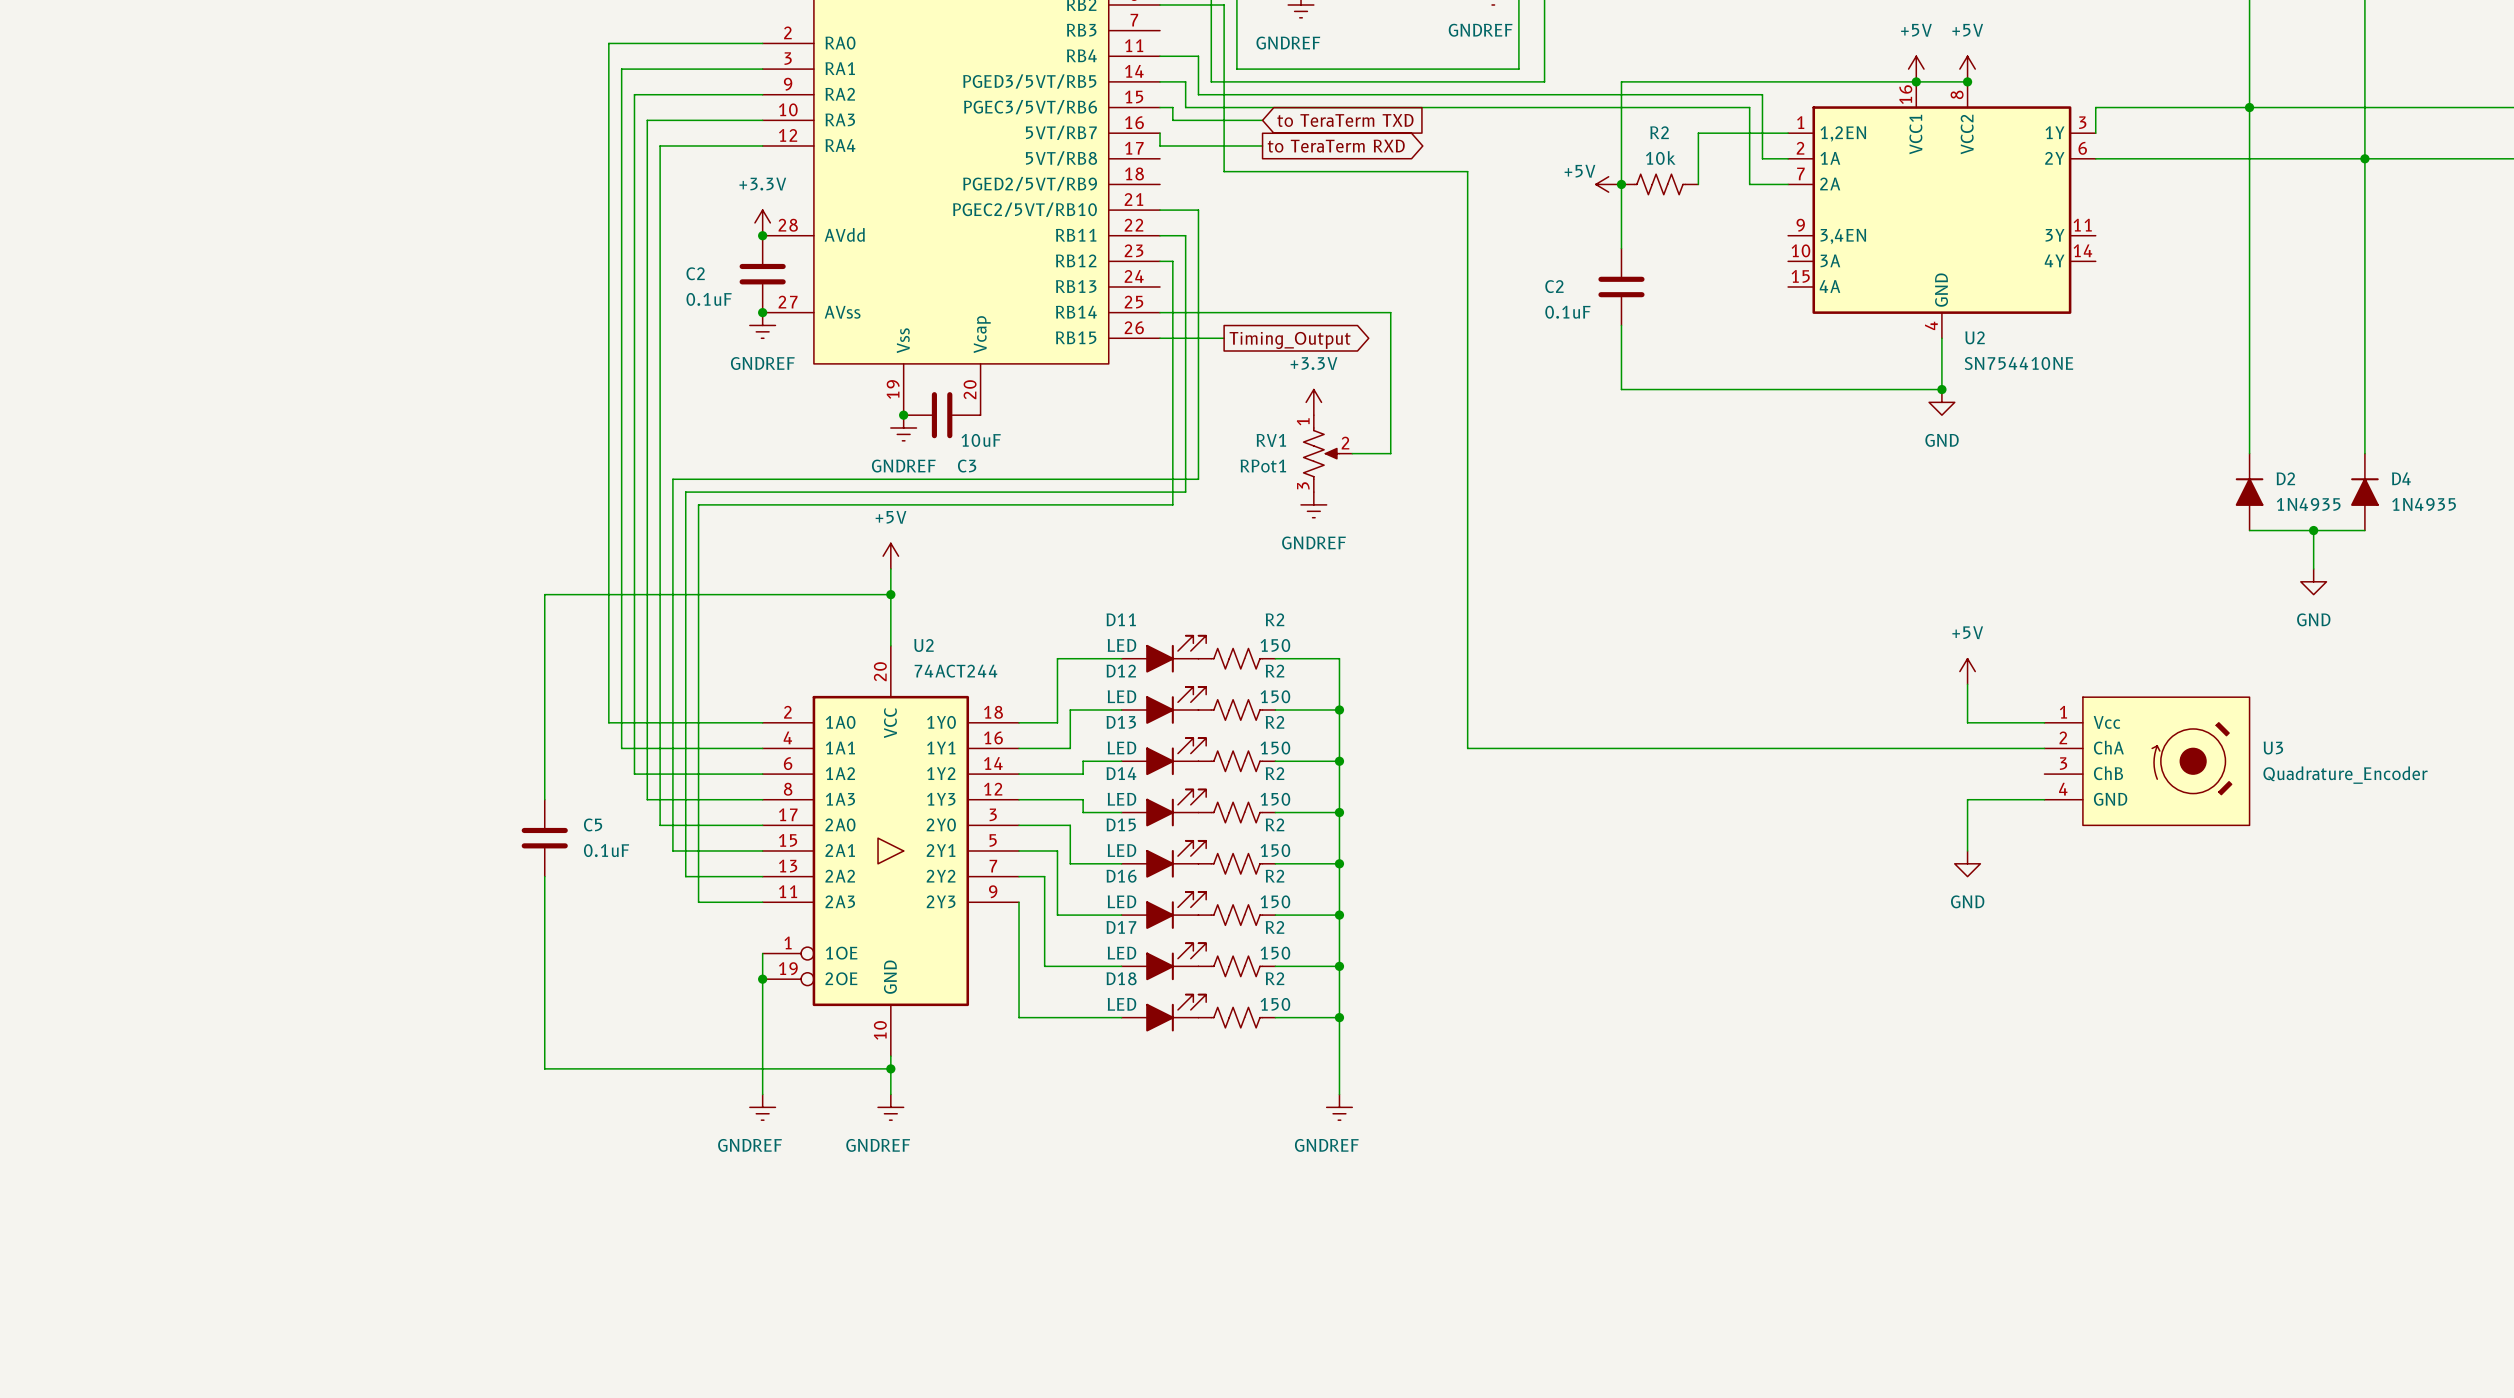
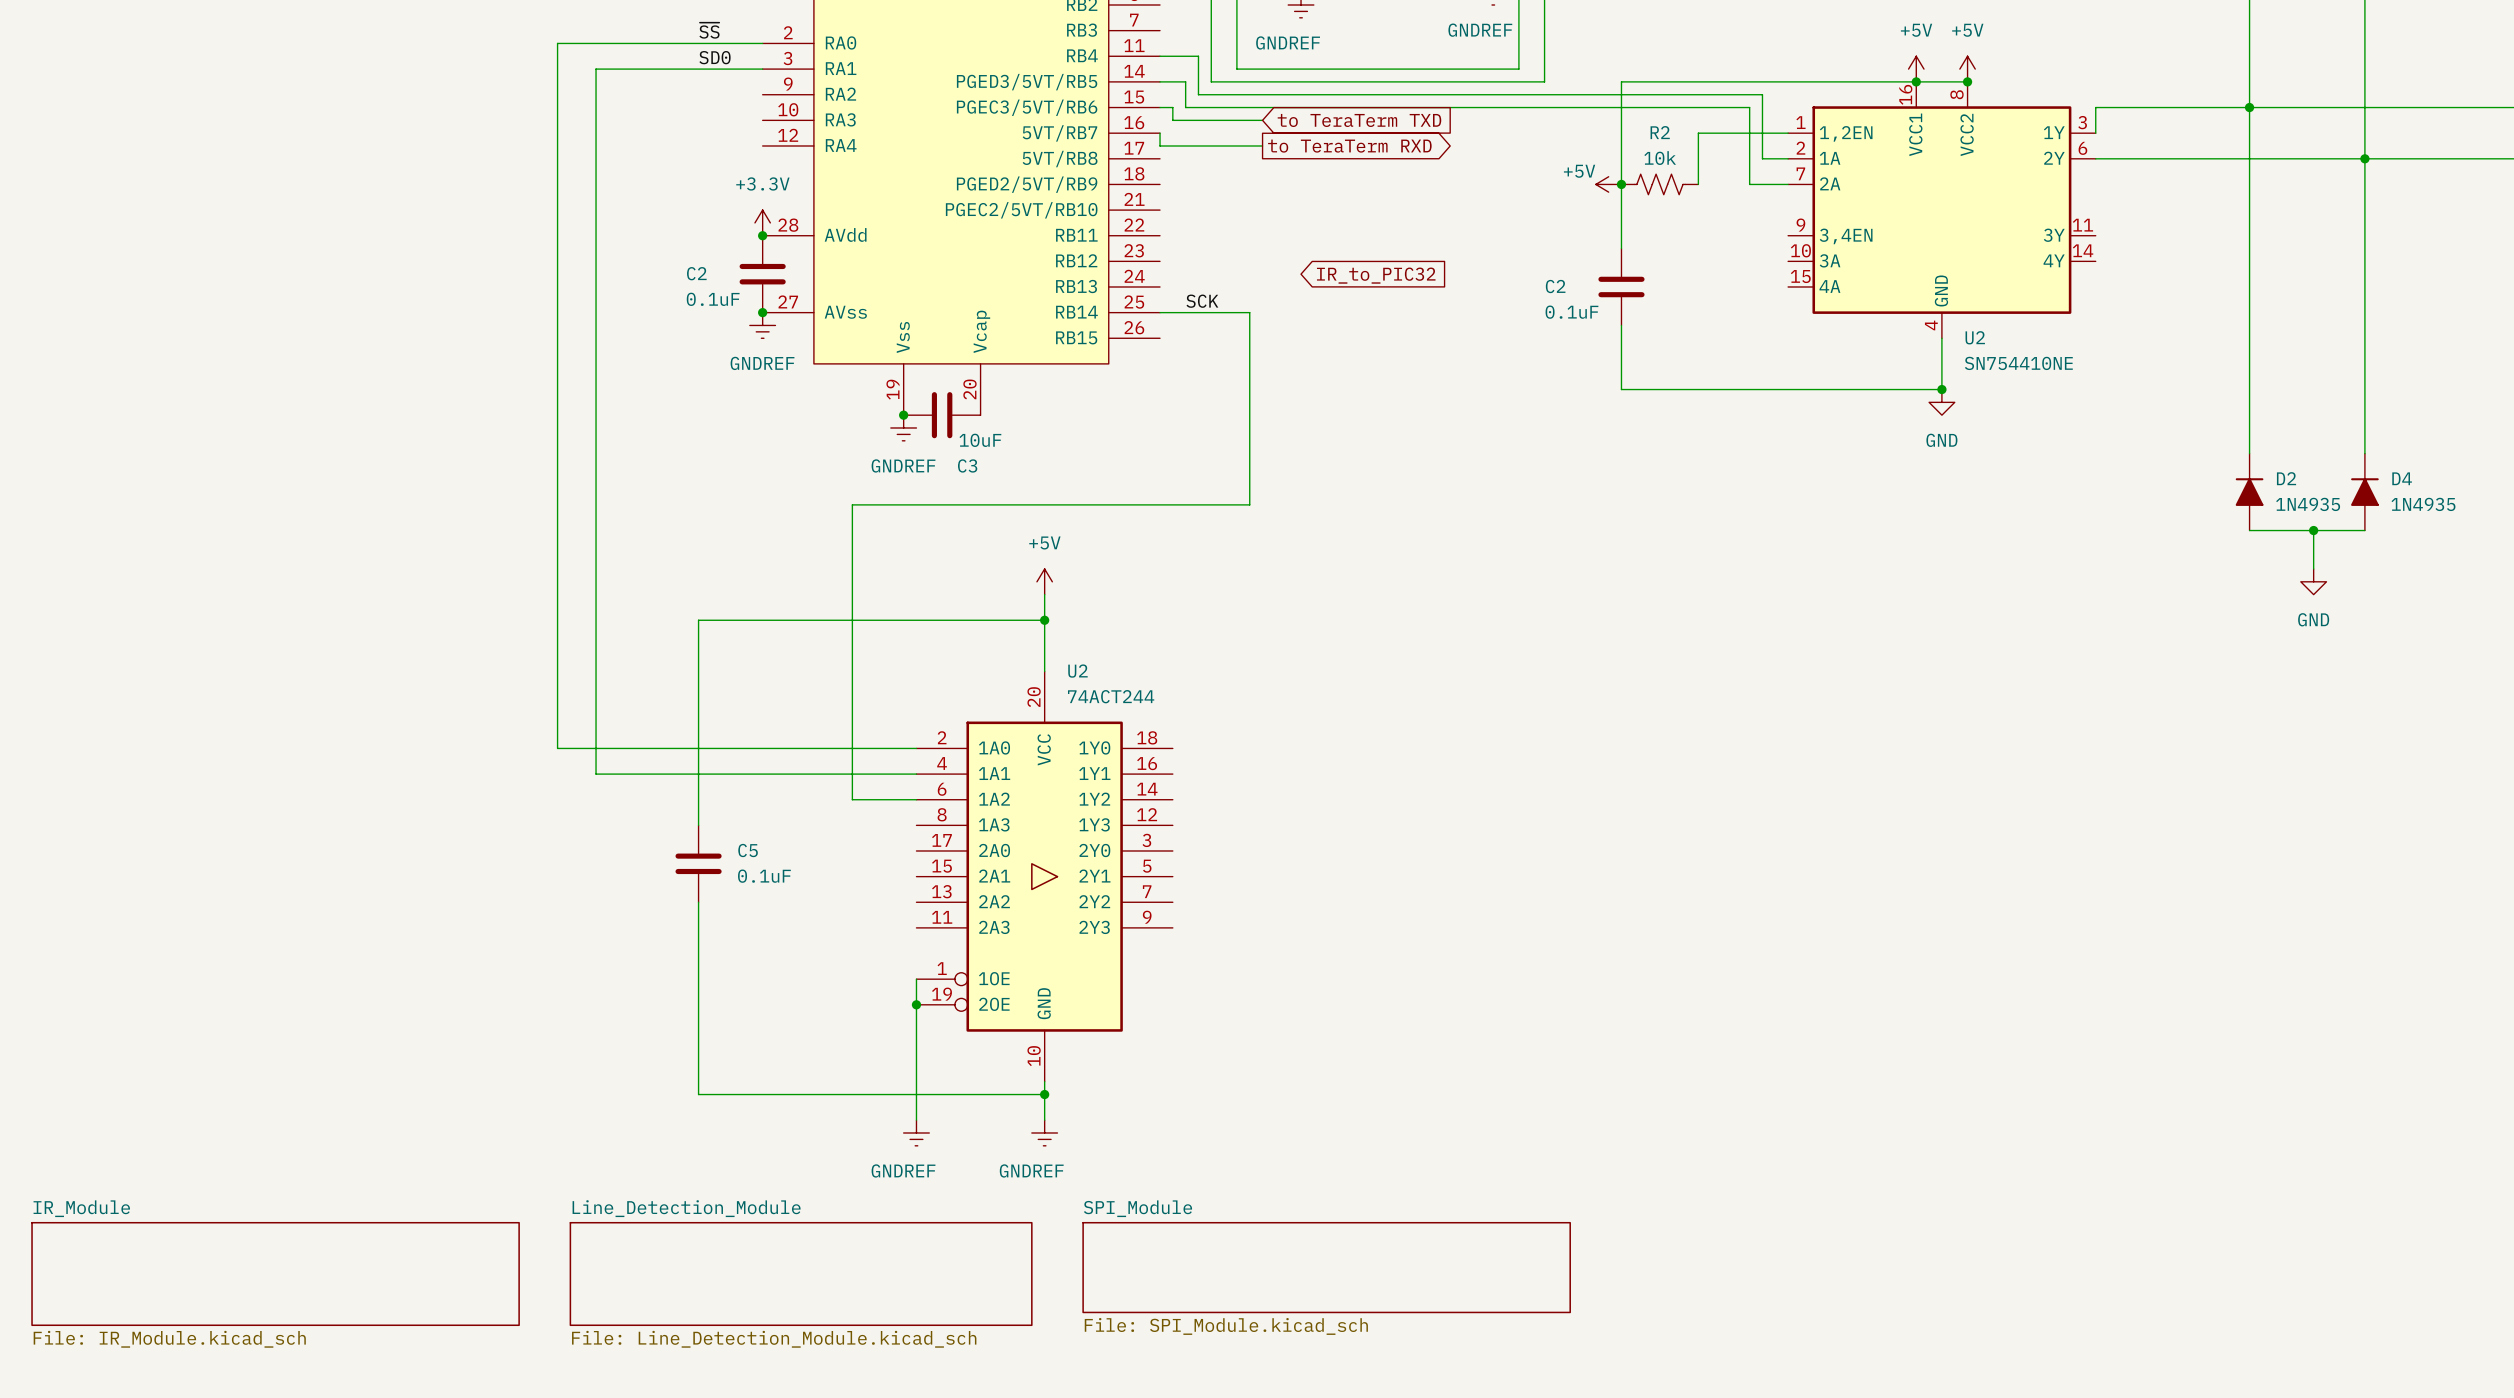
wire: (1160, 4) (1224, 4) (1224, 171) (1467, 171) (1467, 748) (2044, 748) -> none
label: none -> ~{SS} (709, 30)
wire: (608, 43) (608, 722) (762, 722) -> none
label: none -> SD0 (714, 57)
wire: (621, 69) (621, 748) -> (608, 43) (557, 43) (557, 748) (621, 748)
wire: (762, 94) (634, 94) (634, 774) -> (621, 69) (596, 69) (596, 774) (634, 774)
wire: (762, 120) (647, 120) (647, 799) (762, 799) -> none
wire: (762, 145) (660, 145) (660, 825) (762, 825) -> none
wire: (1160, 210) (1198, 210) (1198, 479) (672, 479) (672, 850) (762, 850) -> none
wire: (1160, 235) (1185, 235) (1185, 492) (685, 492) (685, 876) (762, 876) -> none
wire: (1160, 261) (1172, 261) (1172, 504) -> (1249, 312) (1249, 504) (1172, 504)
global label: none -> IR_to_PIC32 (1376, 275)
label: none -> SCK (1202, 301)
wire: (1249, 312) (1390, 312) (1390, 453) (1352, 453) -> none
wire: (1160, 338) (1224, 338) -> none
global label: Timing_Output (1290, 340) -> none
power symbol: +3.3V (1313, 402) -> none
RV1: RPot1 (1327, 453) -> none
wire: (852, 504) (698, 504) (698, 620) -> (1044, 620) (698, 620)
wire: none -> (852, 504) (852, 799) (916, 799)
power symbol: GNDREF (1313, 504) -> none
power symbol position: +5V (890, 556) -> +5V (1044, 581)
wire: (890, 568) (890, 645) -> (1044, 594) (1044, 671)
wire: (890, 594) (544, 594) (544, 799) -> none
junction: (890, 594) -> none
junction: none -> (1044, 620)
D11: LED (1163, 654) -> none
wire: (1121, 658) (1057, 658) (1057, 722) (1019, 722) -> none
R2: 150 (1236, 658) -> none
wire: (1275, 658) (1339, 658) (1339, 1094) -> none
power symbol: +5V (1967, 671) -> none
wire: (1967, 684) (1967, 722) (2044, 722) -> none
D12: LED (1163, 705) -> none
wire: (1121, 709) (1070, 709) (1070, 748) (1019, 748) -> none
R2: 150 (1236, 709) -> none
wire: (1275, 709) (1339, 709) -> none
junction: (1339, 709) -> none
D13: LED (1163, 756) -> none
R2: 150 (1236, 761) -> none
wire: (1275, 761) (1339, 761) -> none
junction: (1339, 761) -> none
U3: Quadrature_Encoder (2147, 761) -> none
wire: (2044, 799) (1967, 799) (1967, 850) -> none
D14: LED (1163, 807) -> none
R2: 150 (1236, 812) -> none
wire: (1275, 812) (1339, 812) -> none
junction: (1339, 812) -> none
wire: (698, 825) (698, 902) (762, 902) -> none
C5 position: (544, 838) -> (698, 863)
U2 position: (890, 850) -> (1044, 876)
D15: LED (1163, 859) -> none
R2: 150 (1236, 863) -> none
wire: (1275, 863) (1339, 863) -> none
junction: (1339, 863) -> none
power symbol: GND (1967, 863) -> none
wire: (544, 876) (544, 1068) (890, 1068) -> (698, 902) (698, 1094) (1044, 1094)
D16: LED (1163, 910) -> none
R2: 150 (1236, 915) -> none
wire: (1275, 915) (1339, 915) -> none
junction: (1339, 915) -> none
wire: (762, 953) (762, 1094) -> (916, 979) (916, 1120)
D17: LED (1163, 961) -> none
R2: 150 (1236, 966) -> none
wire: (1275, 966) (1339, 966) -> none
junction: (1339, 966) -> none
junction: (762, 979) -> none
junction: none -> (916, 1004)
D18: LED (1163, 1013) -> none
R2: 150 (1236, 1017) -> none
wire: (1275, 1017) (1339, 1017) -> none
junction: (1339, 1017) -> none
wire: (890, 1056) (890, 1094) -> (1044, 1081) (1044, 1120)
junction: (890, 1068) -> none
junction: none -> (1044, 1094)
power symbol: GNDREF (762, 1107) -> none
power symbol position: GNDREF (890, 1107) -> GNDREF (916, 1132)
power symbol: GNDREF (1339, 1107) -> none
power symbol: none -> GNDREF (1044, 1132)
sheet SPI_Module: none -> File: SPI_Module.kicad_sch (1326, 1267)
sheet IR_Module: none -> File: IR_Module.kicad_sch (275, 1273)
sheet Line_Detection_Module: none -> File: Line_Detection_Module.kicad_sch (801, 1273)

